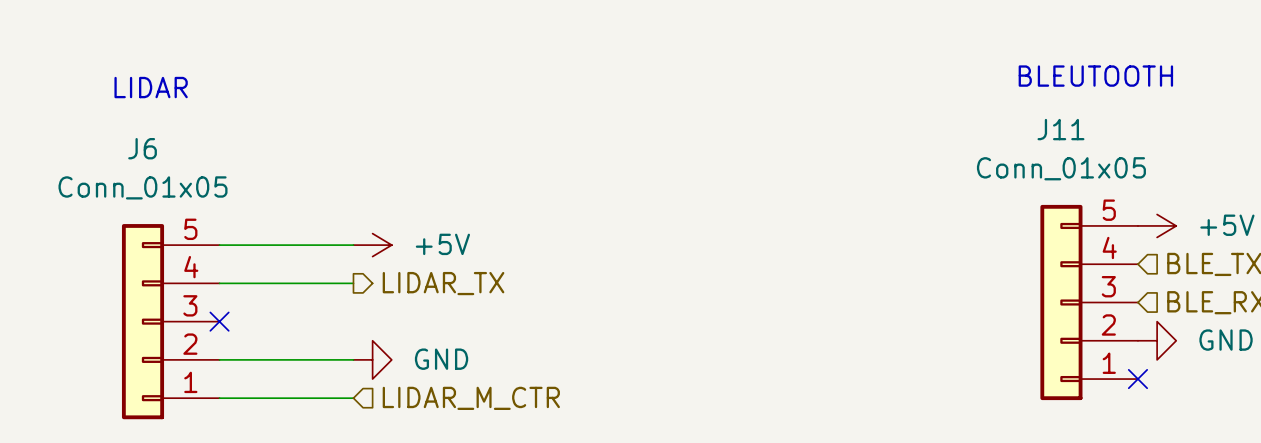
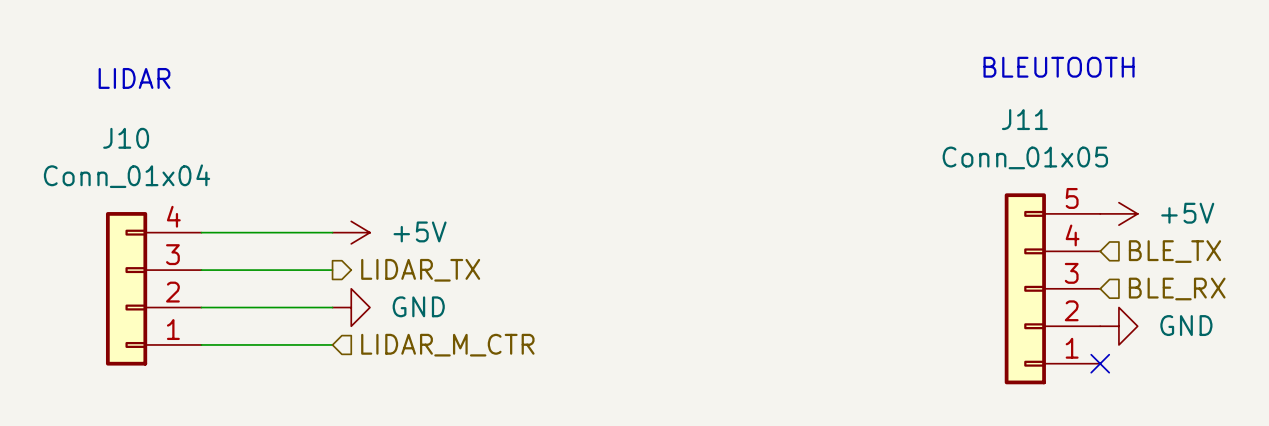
J10: none -> Conn_01x04 (153, 288)
J6: Conn_01x05 (170, 321) -> none
no-connect mark: (219, 321) -> none
power symbol position: GND (372, 359) -> GND (351, 307)
wire: (219, 398) (353, 398) -> (201, 307) (332, 307)
hierarchical label position: LIDAR_M_CTR (471, 398) -> LIDAR_M_CTR (447, 345)

